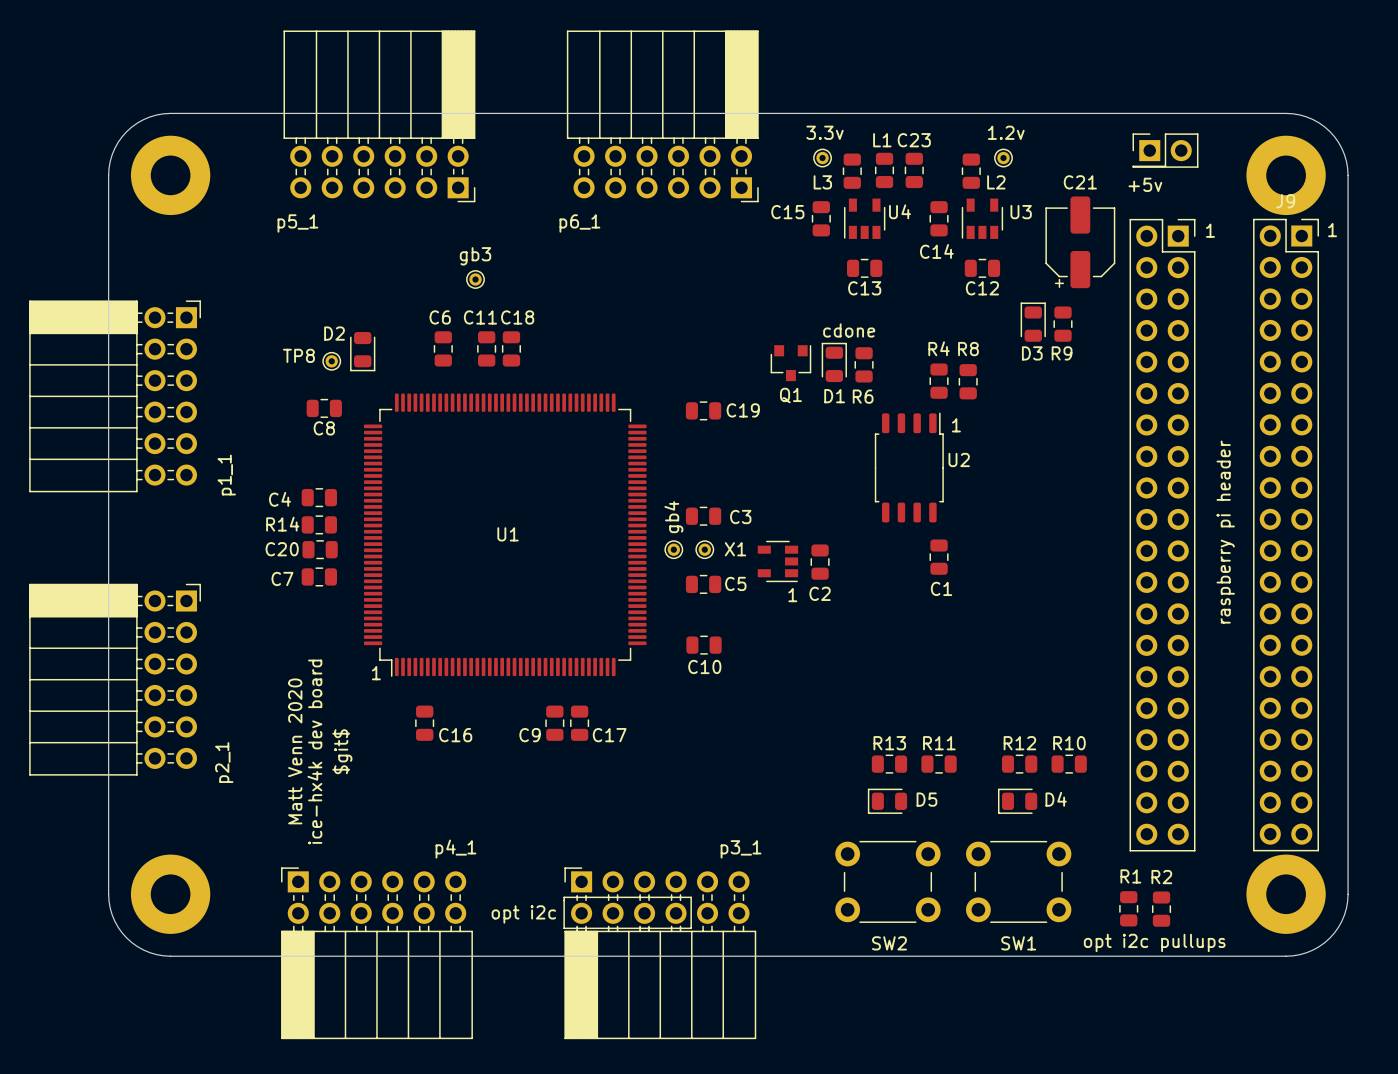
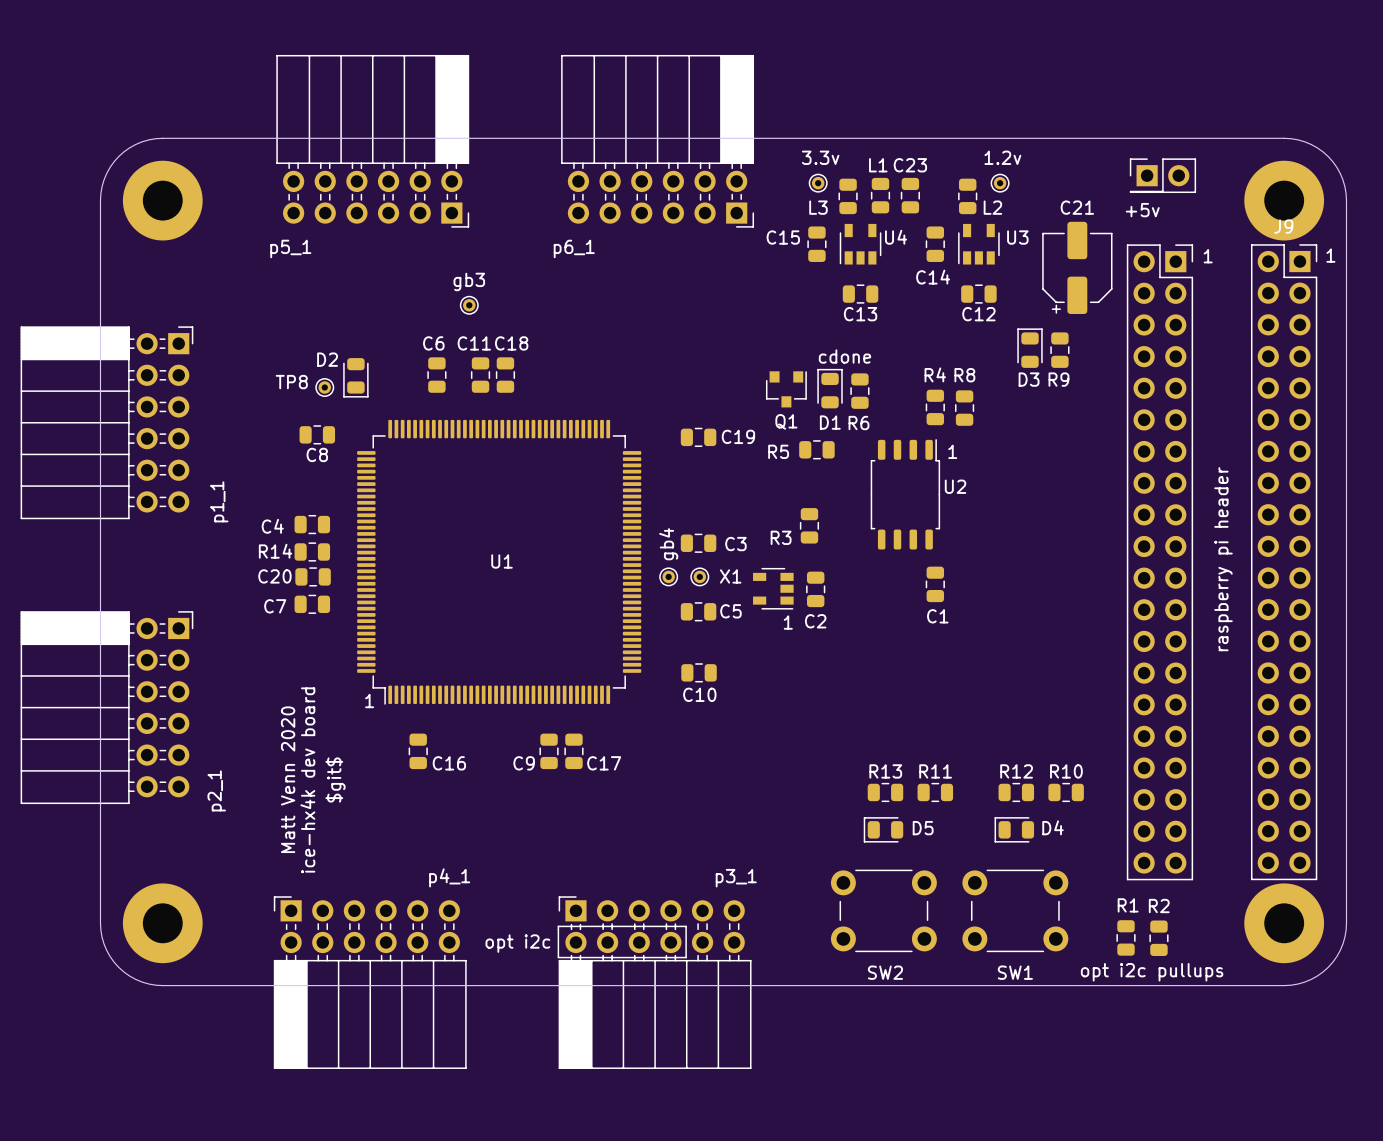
R5: none -> (816, 449)
R3: none -> (809, 525)

